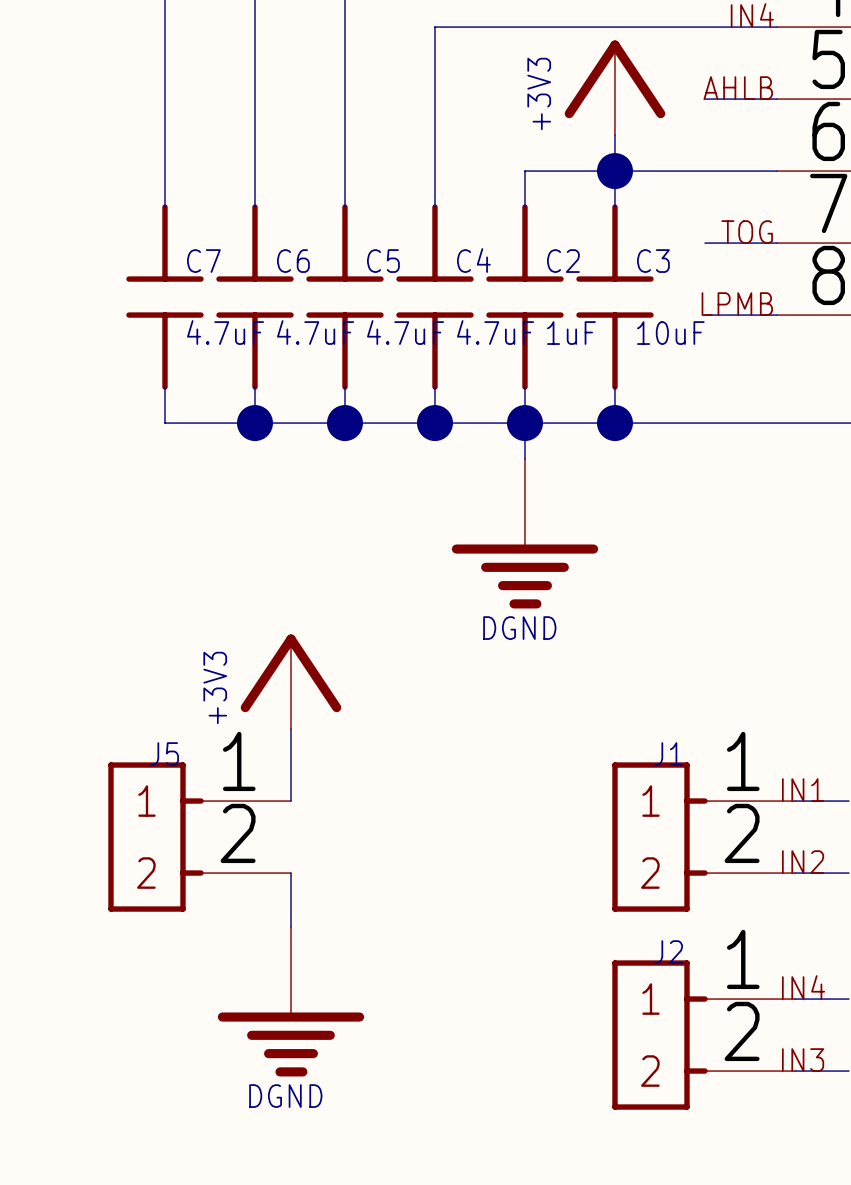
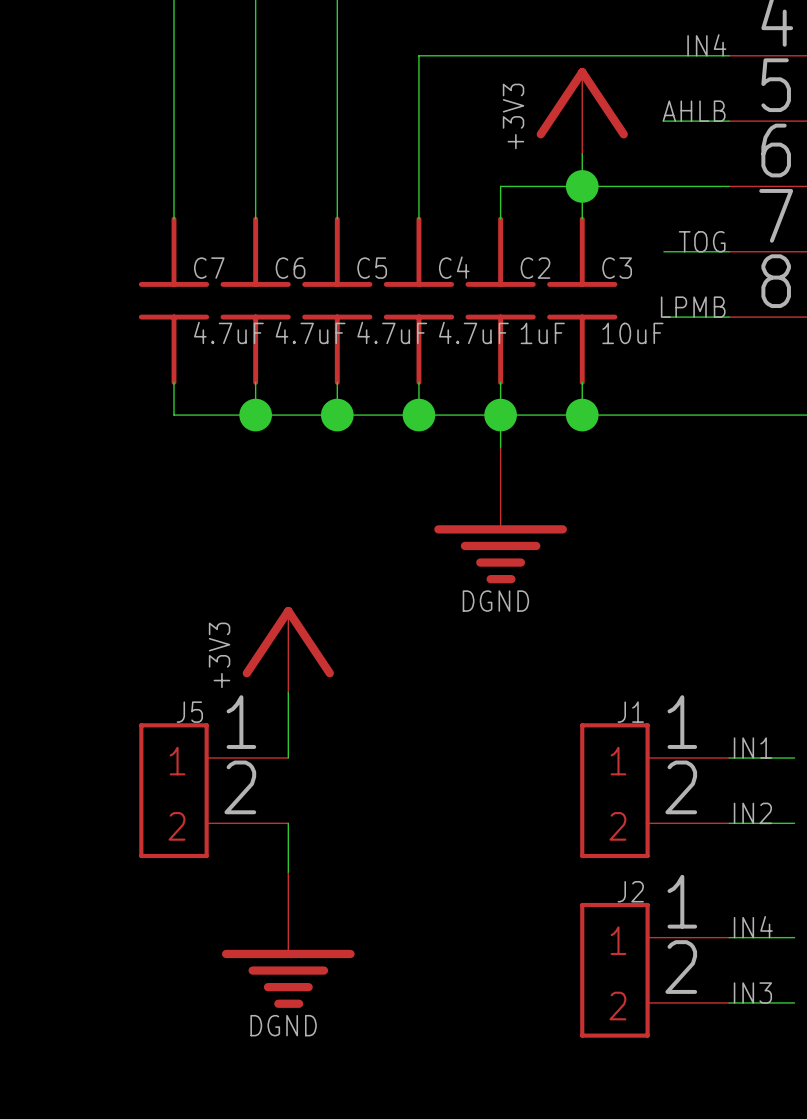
J5 symbol: [108, 762, 291, 912] -> [139, 723, 289, 859]
J1 symbol: [612, 762, 795, 912] -> [580, 723, 730, 859]
J2 symbol: [612, 960, 795, 1110] -> [580, 902, 730, 1038]

